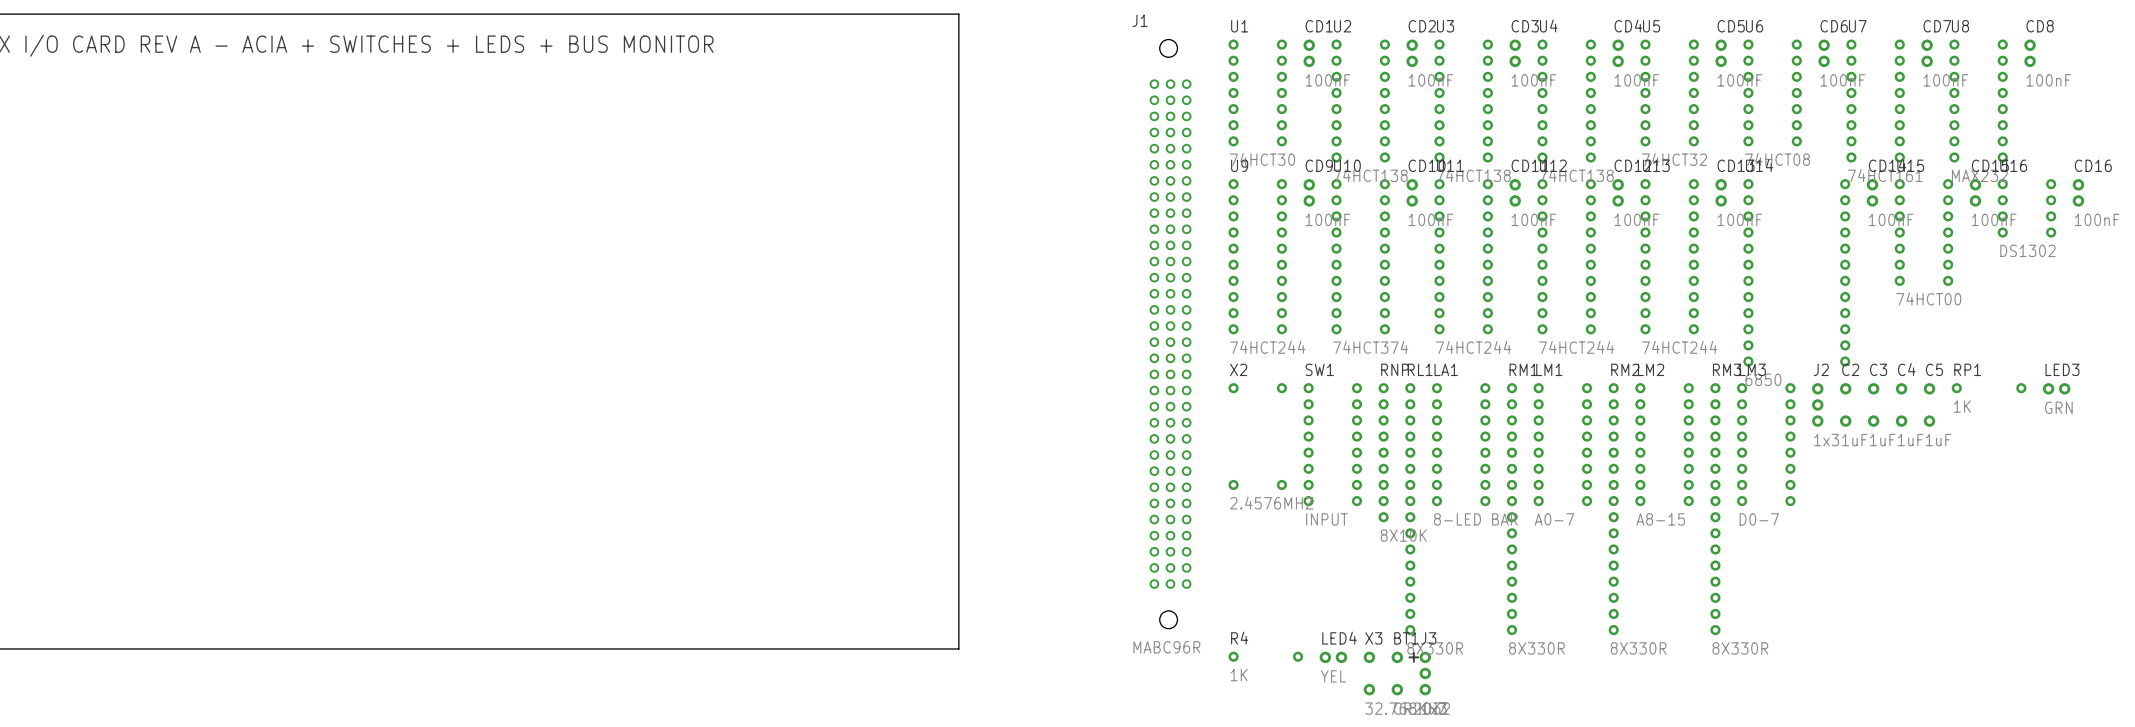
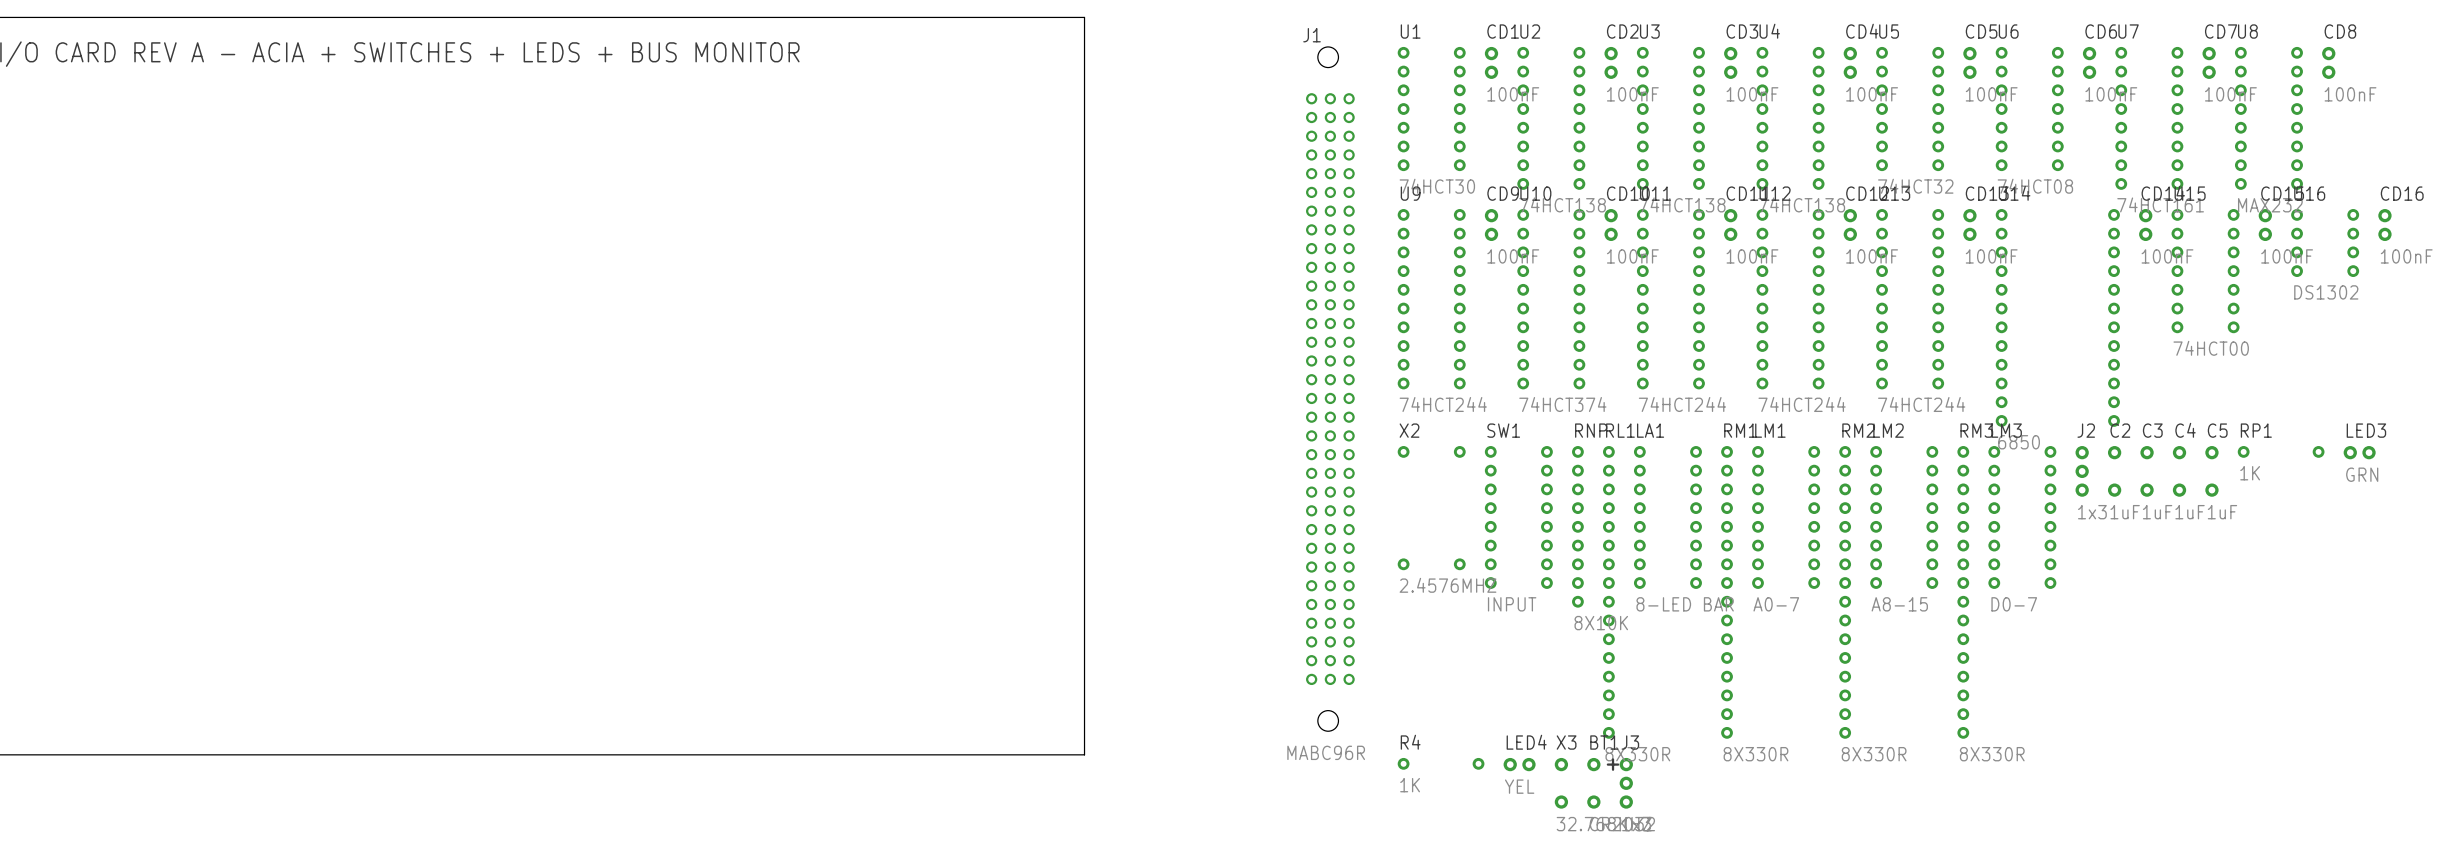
J1 name position: J1 (1140, 20) -> J1 (1312, 35)

